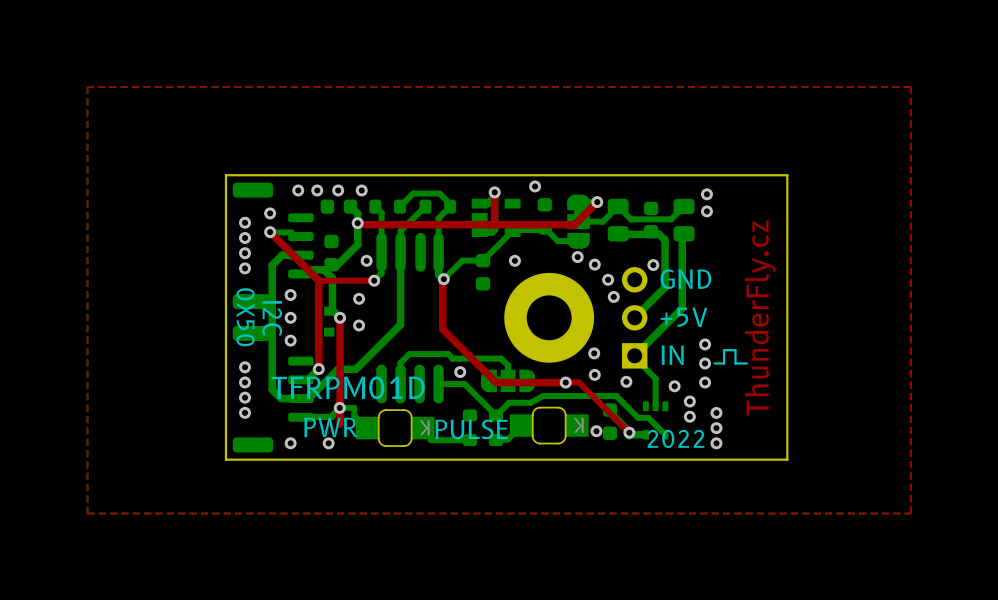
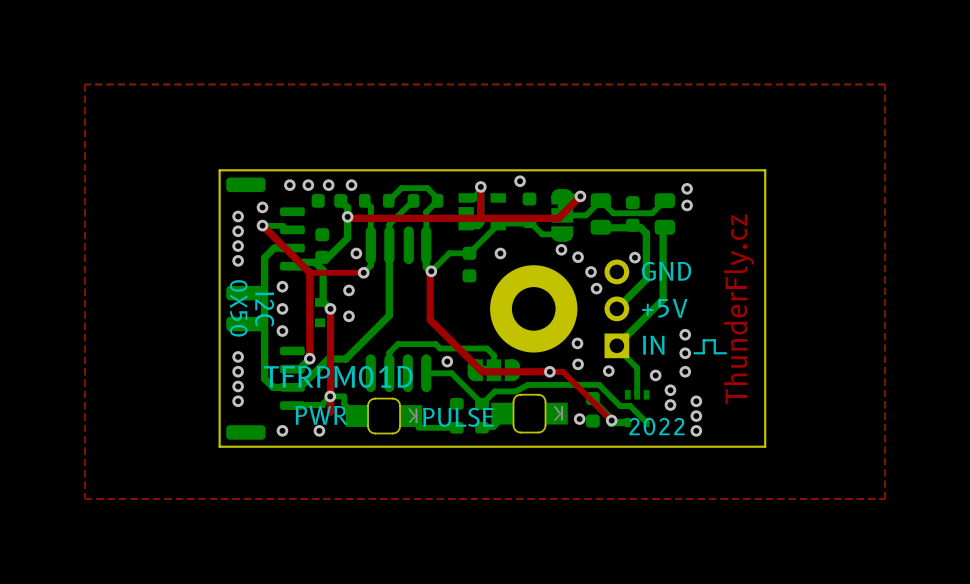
part footprint: [509, 407, 589, 444] -> [491, 394, 568, 433]

